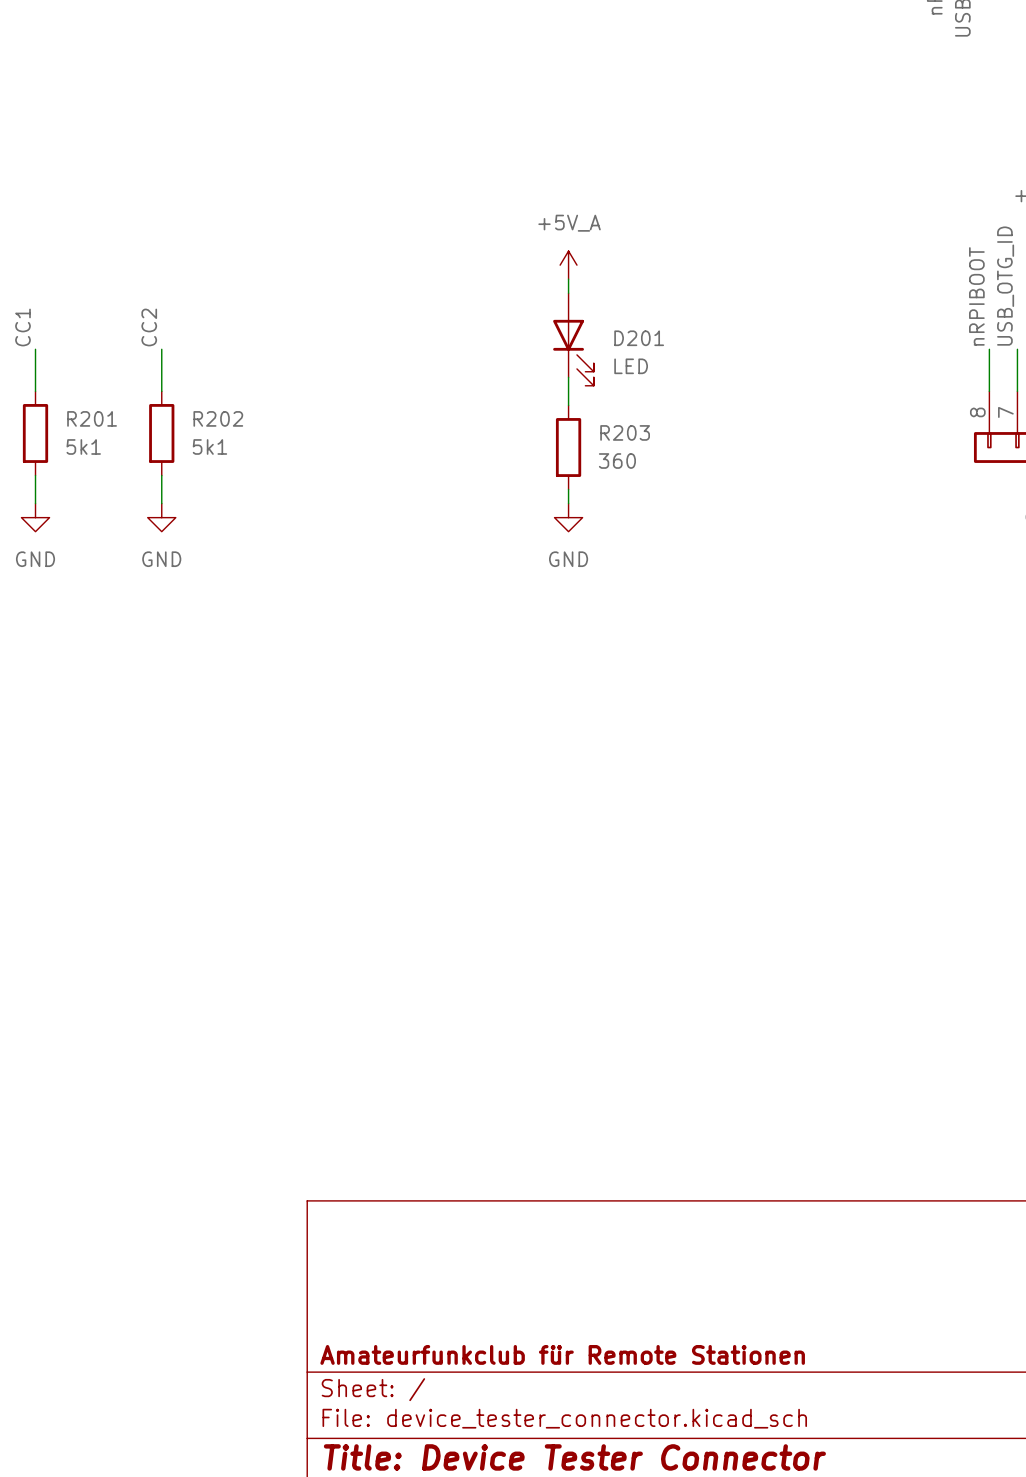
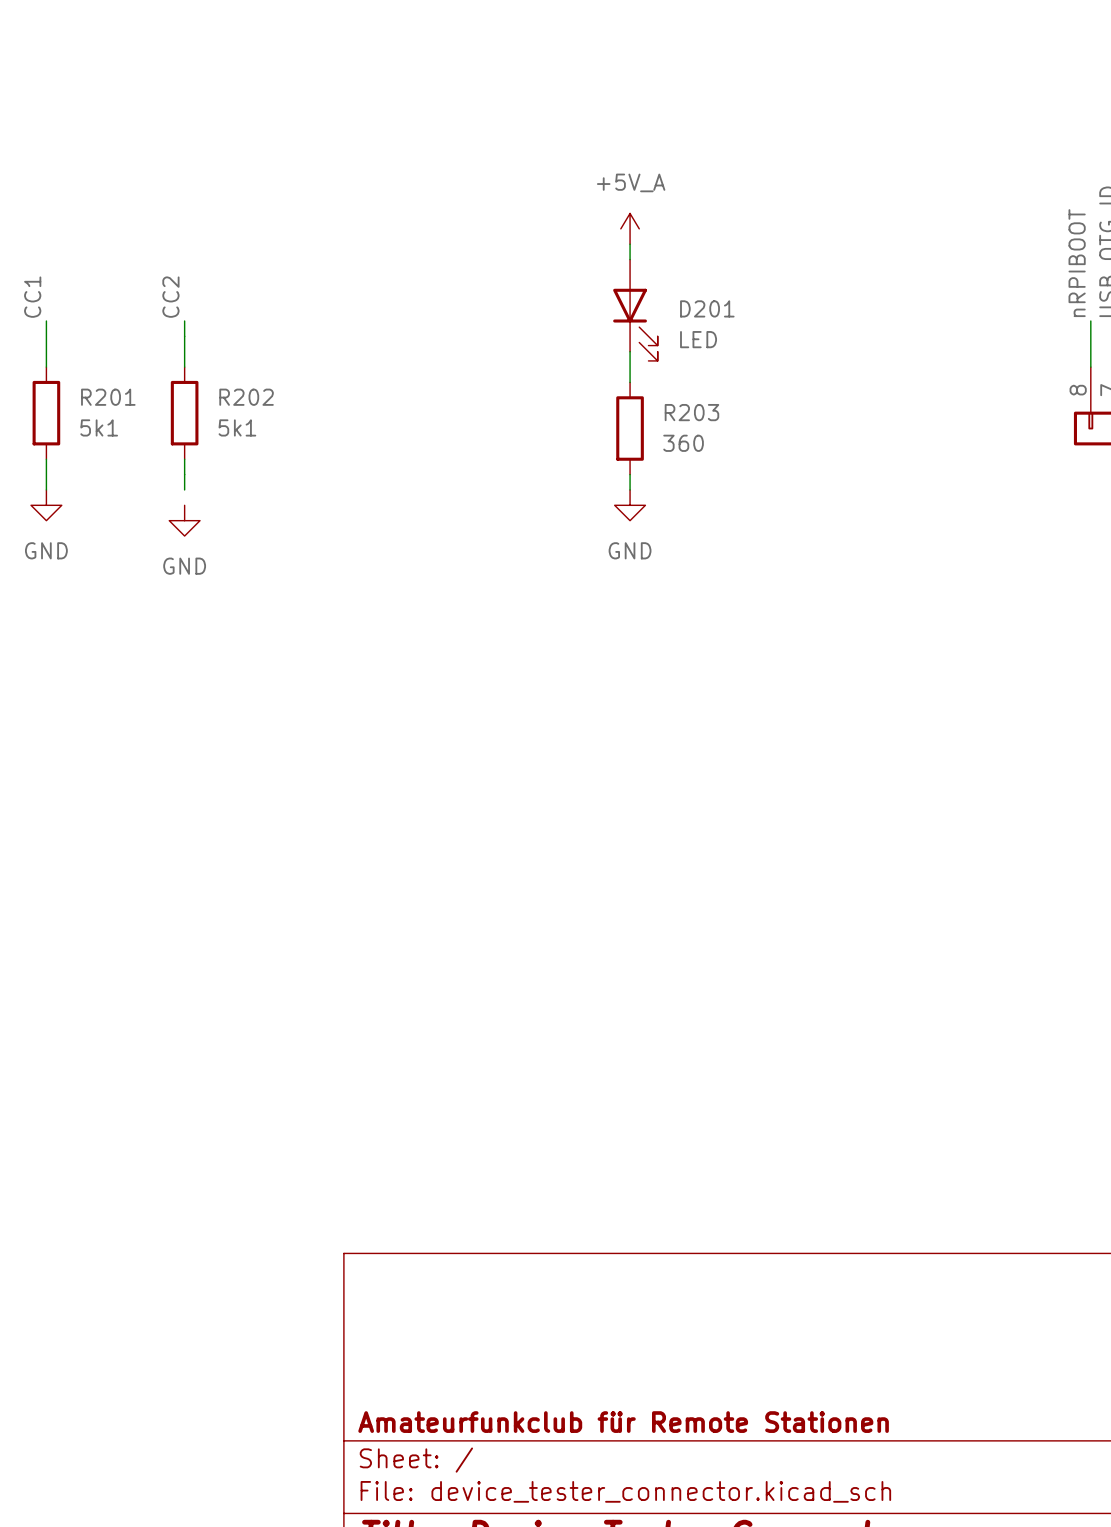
power symbol position: GND (161, 517) -> GND (184, 520)

